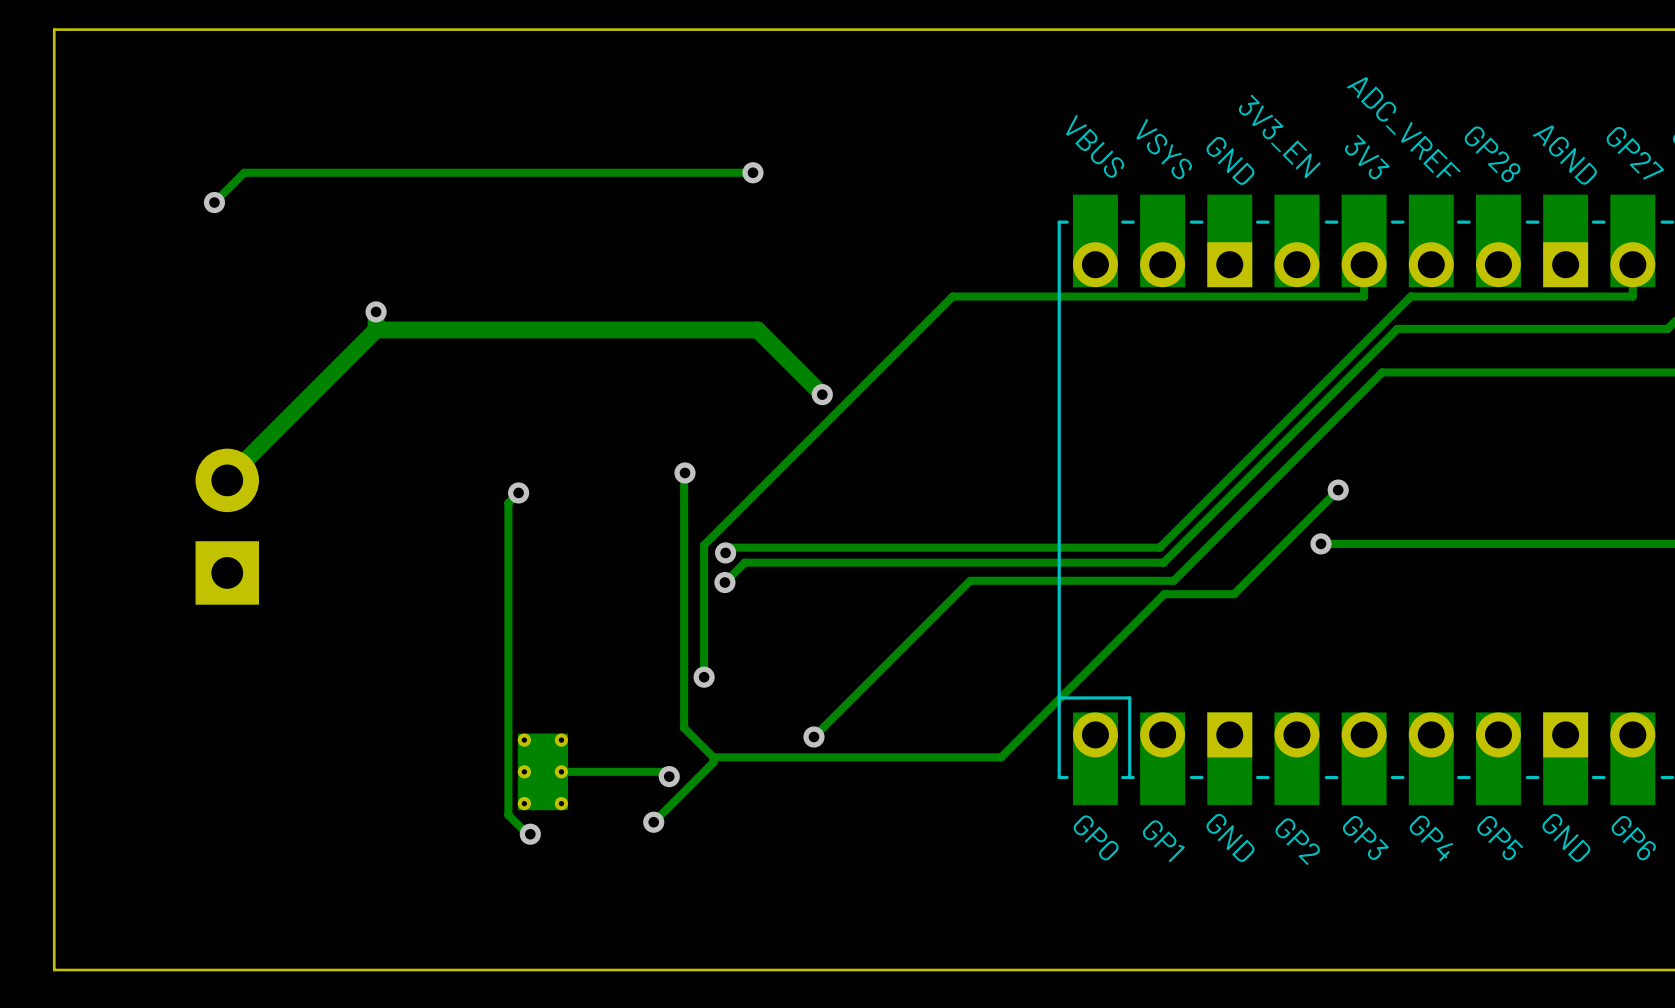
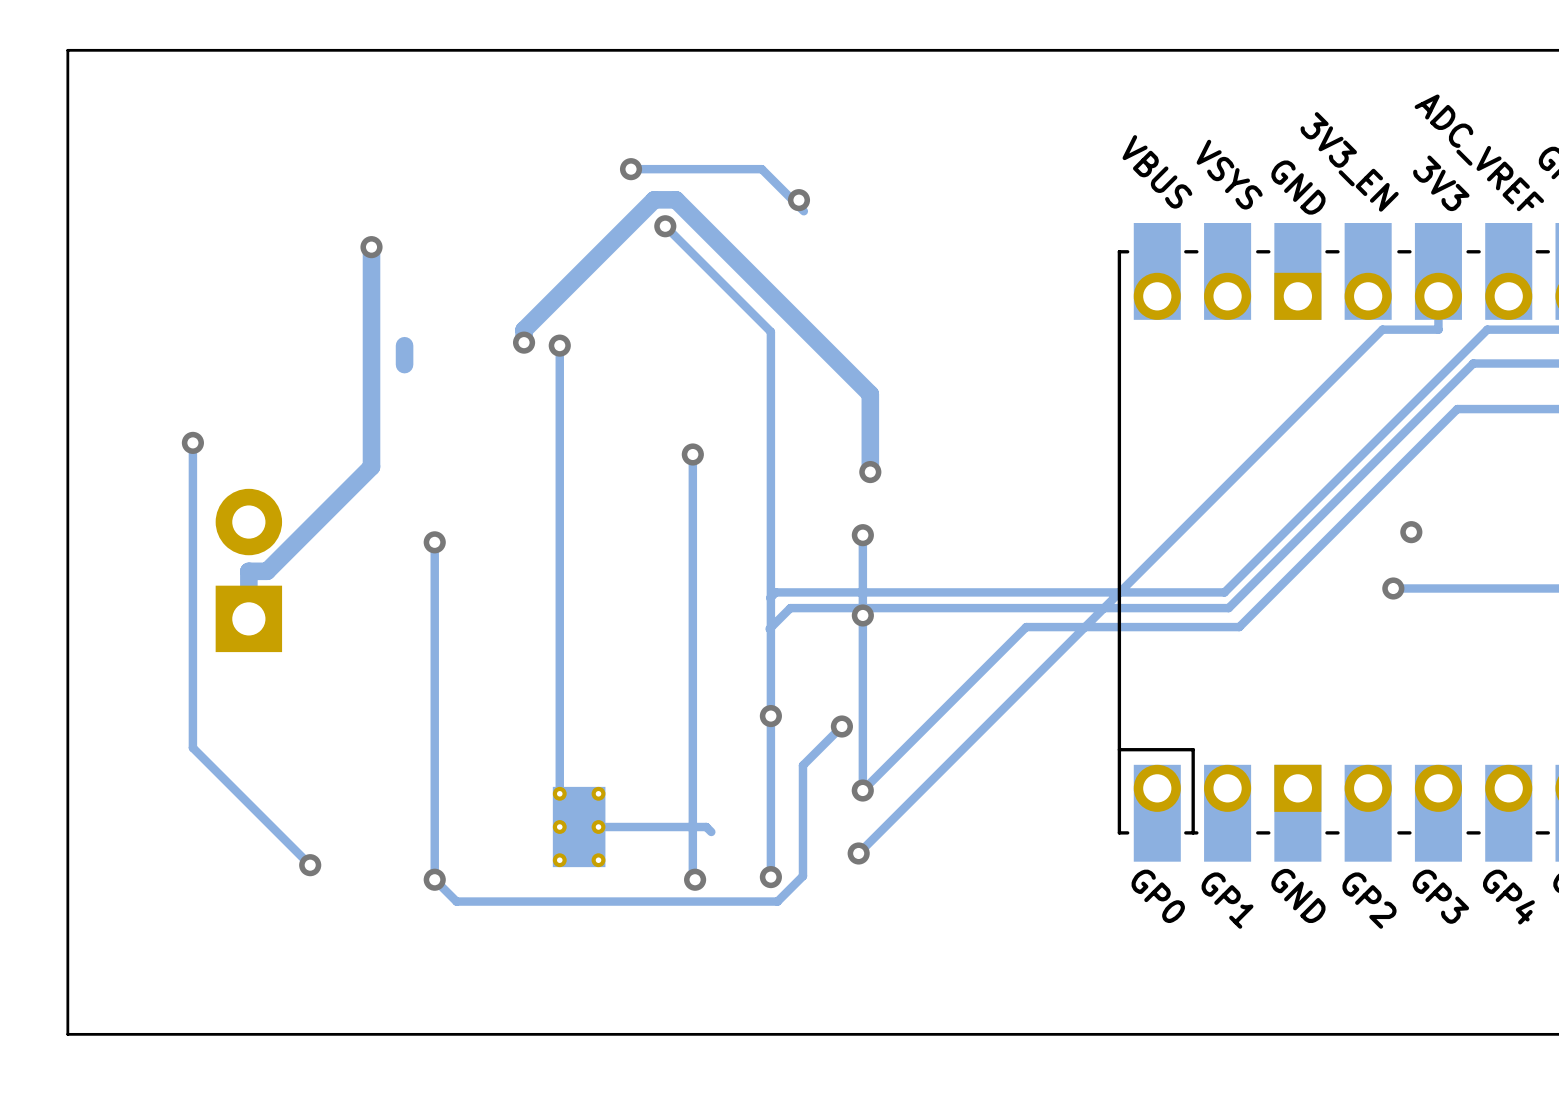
track: none -> (631, 169) (761, 169) (803, 211)
via: none -> (631, 169)
track: (752, 172) (244, 172) (214, 202) -> none
track: none -> (665, 226) (770, 331) (770, 877)
via: none -> (665, 226)
via: (214, 202) -> none
track: none -> (371, 247) (371, 466) (267, 571) (248, 571) (248, 618)
via: none -> (371, 247)
track: (1310, 296) (952, 296) (704, 545) (704, 677) -> (1382, 329) (858, 853)
track: none -> (524, 342) (524, 330) (654, 199) (675, 199) (870, 394) (870, 472)
via: none -> (524, 342)
via: (376, 311) -> none
track: none -> (559, 345) (559, 793)
via: none -> (559, 345)
track: (822, 394) (757, 329) (376, 329) (227, 480) -> none
via position: (822, 394) -> (870, 472)
track: none -> (192, 442) (192, 747) (310, 865)
via: none -> (192, 442)
track: none -> (692, 454) (692, 879)
via: none -> (692, 454)
track: (684, 472) (684, 728) (713, 757) -> none
via: (684, 472) -> none
track: (1338, 490) (1234, 594) (1164, 594) (1001, 757) (713, 757) -> none
track: (518, 492) (508, 503) (508, 815) (527, 834) (530, 834) -> none
via: (518, 492) -> none
track: none -> (862, 535) (862, 789)
via: none -> (862, 535)
track: none -> (434, 542) (434, 879) (456, 901) (777, 901) (802, 876) (802, 765) (841, 726)
via: none -> (434, 542)
via: (725, 552) -> none
via: none -> (862, 615)
via: (724, 582) -> none
via: none -> (841, 726)
via position: (704, 677) -> (770, 716)
track: (713, 757) (713, 762) (653, 822) -> none
via: (669, 776) -> none
via: none -> (858, 853)
via: none -> (310, 865)
via: none -> (770, 877)
via: none -> (434, 879)
via: (530, 834) -> none

